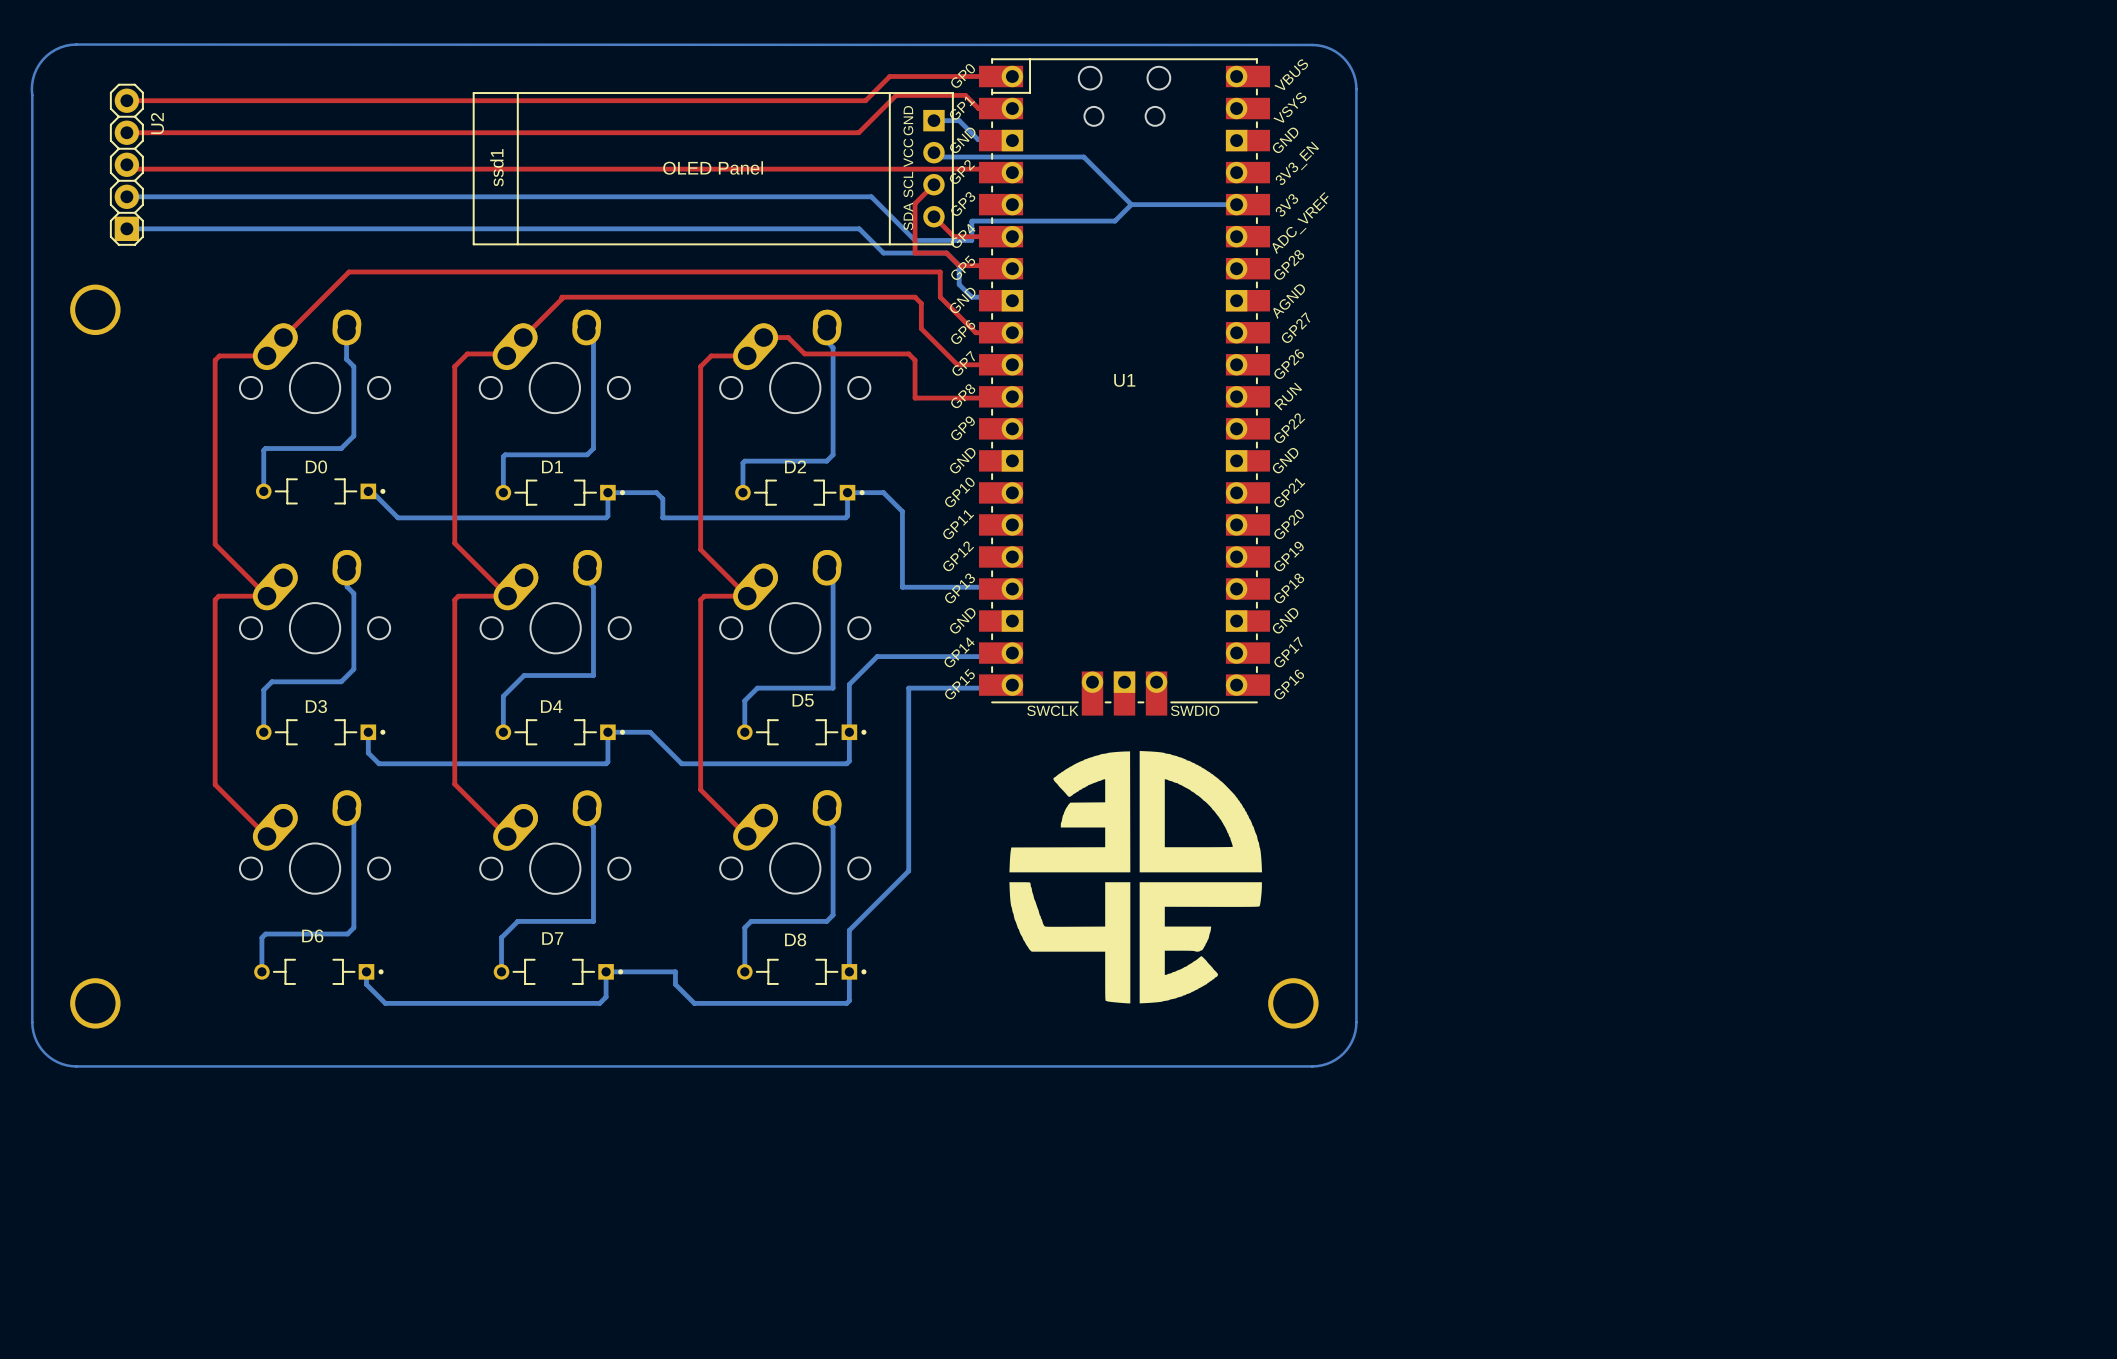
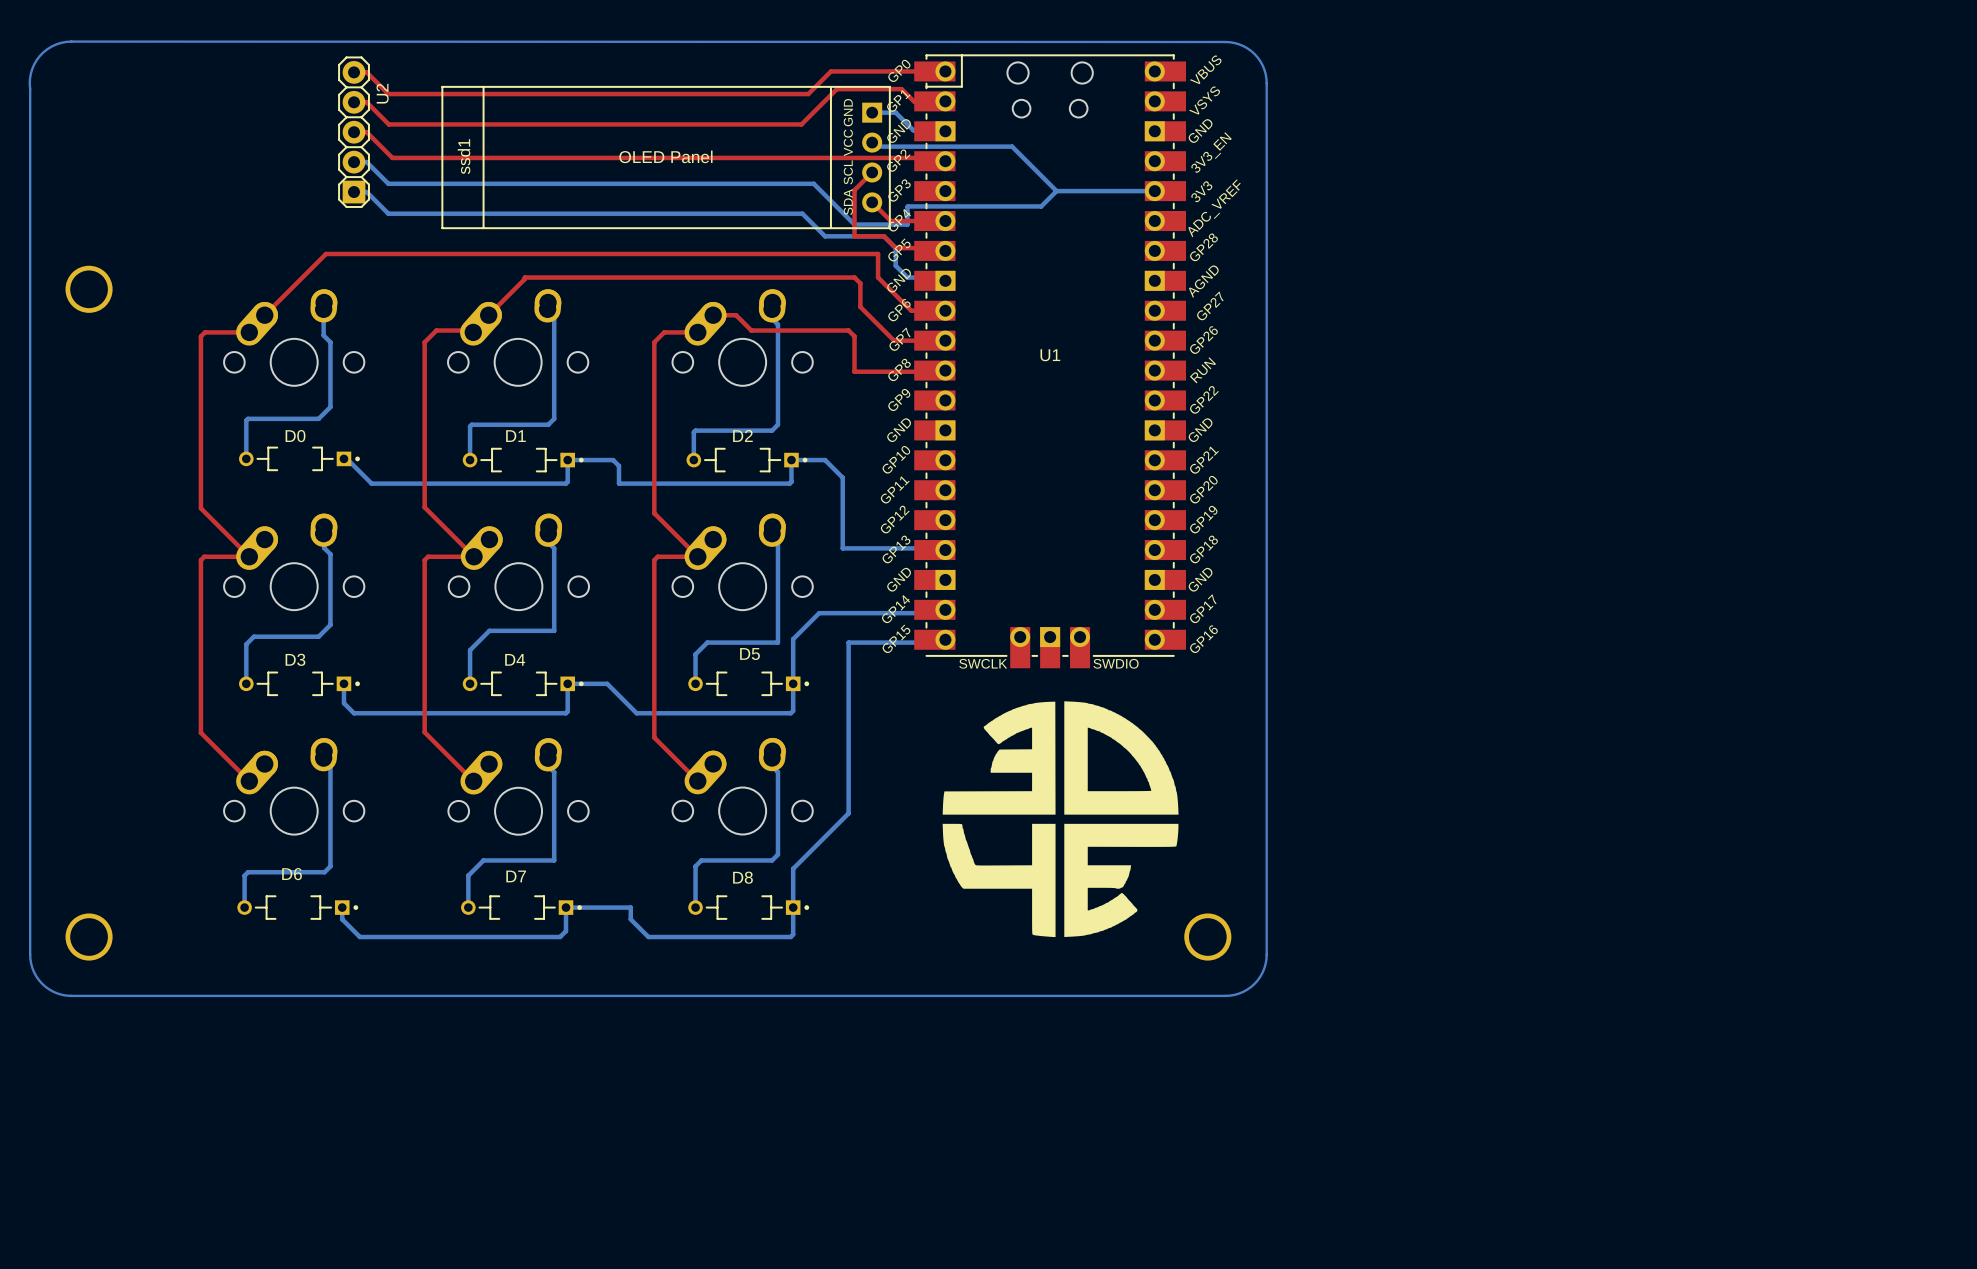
top track: (126, 100) (415, 100) -> (354, 71) (366, 72) (388, 94)
top track: (126, 132) (858, 132) -> (354, 101) (366, 102) (388, 124) (802, 123)
top track: (126, 164) (131, 169) (420, 169) -> (357, 135) (354, 132) (366, 132) (392, 157)
U2 position: (126, 164) -> (354, 132)
bottom track: (126, 196) (415, 196) -> (354, 161) (366, 162) (388, 183)
bottom track: (126, 228) (415, 228) -> (354, 191) (366, 192) (388, 213)

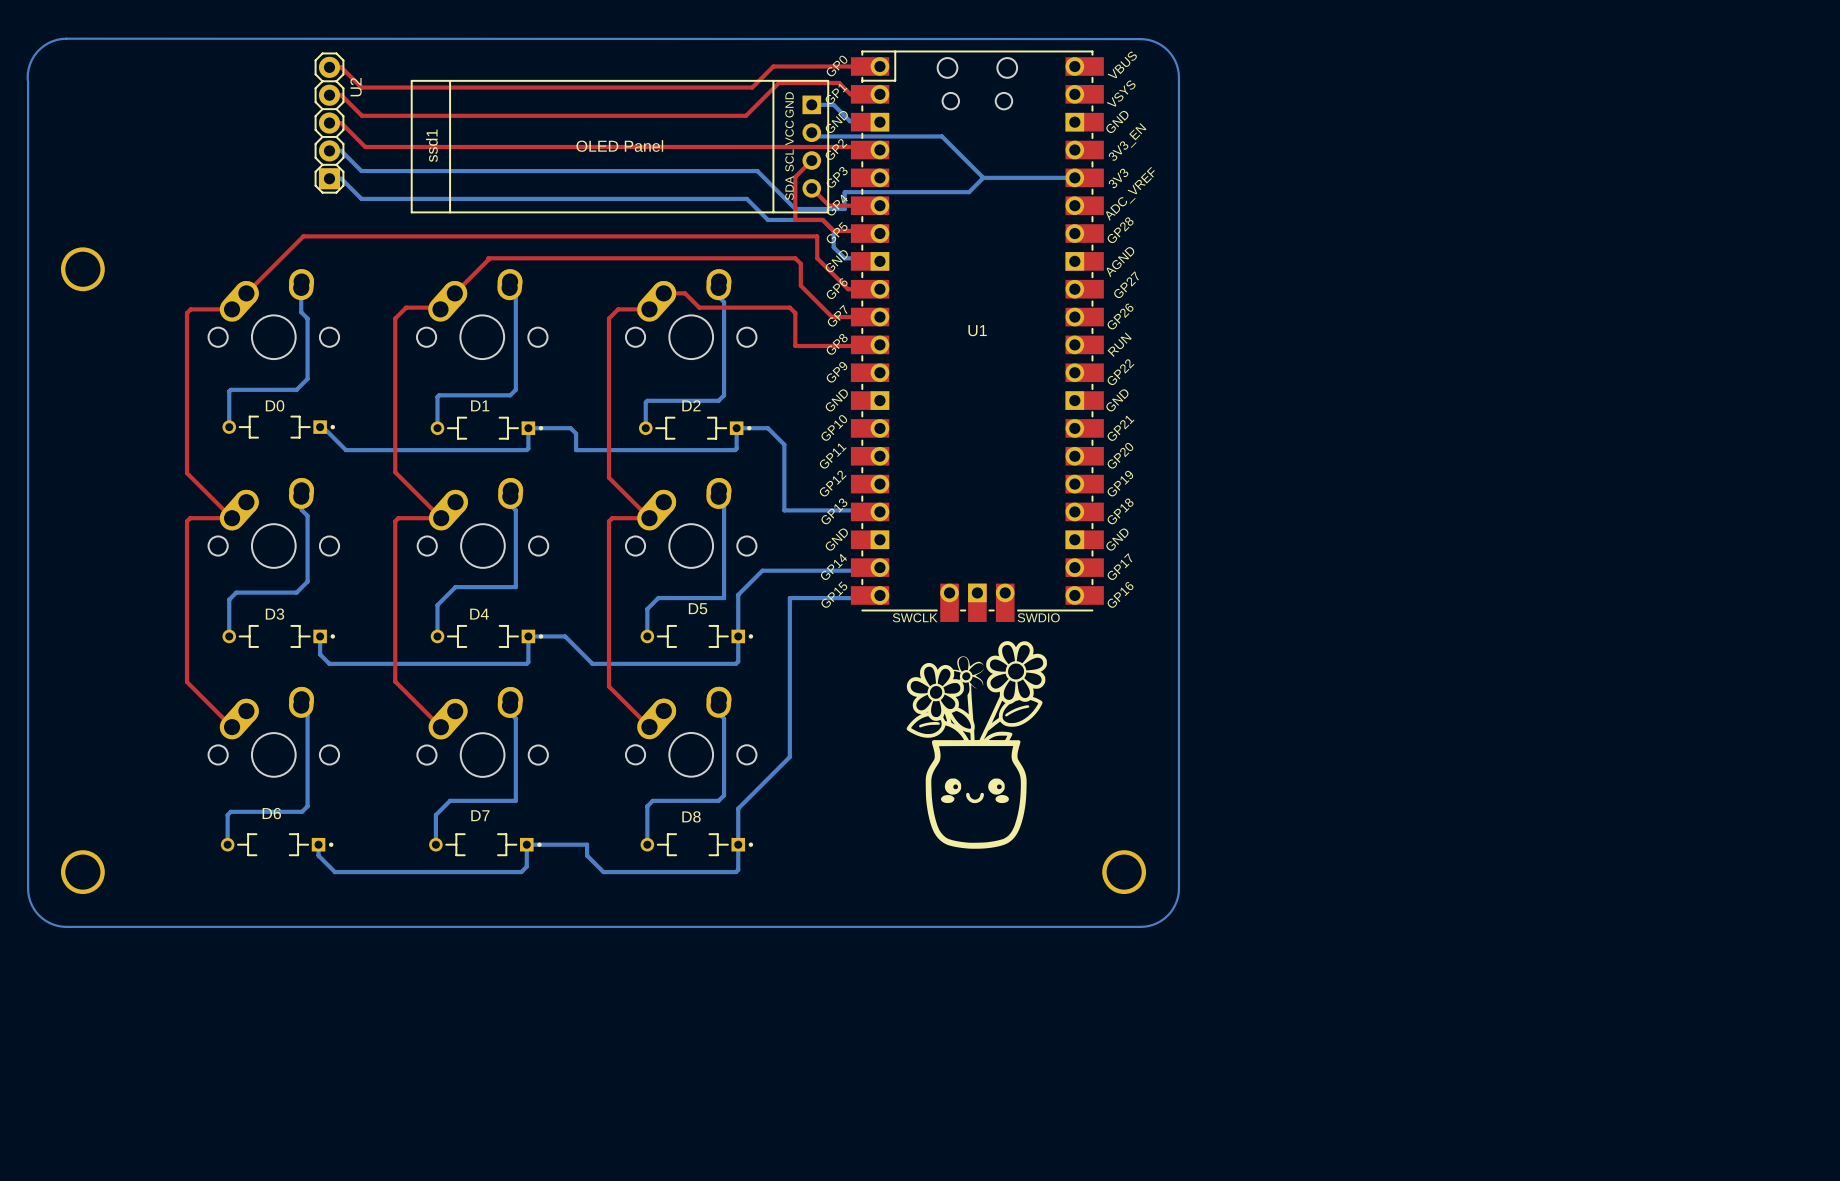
drawing: none -> [906, 641, 1047, 849]
drawing: [942, 701, 1179, 938] -> none

